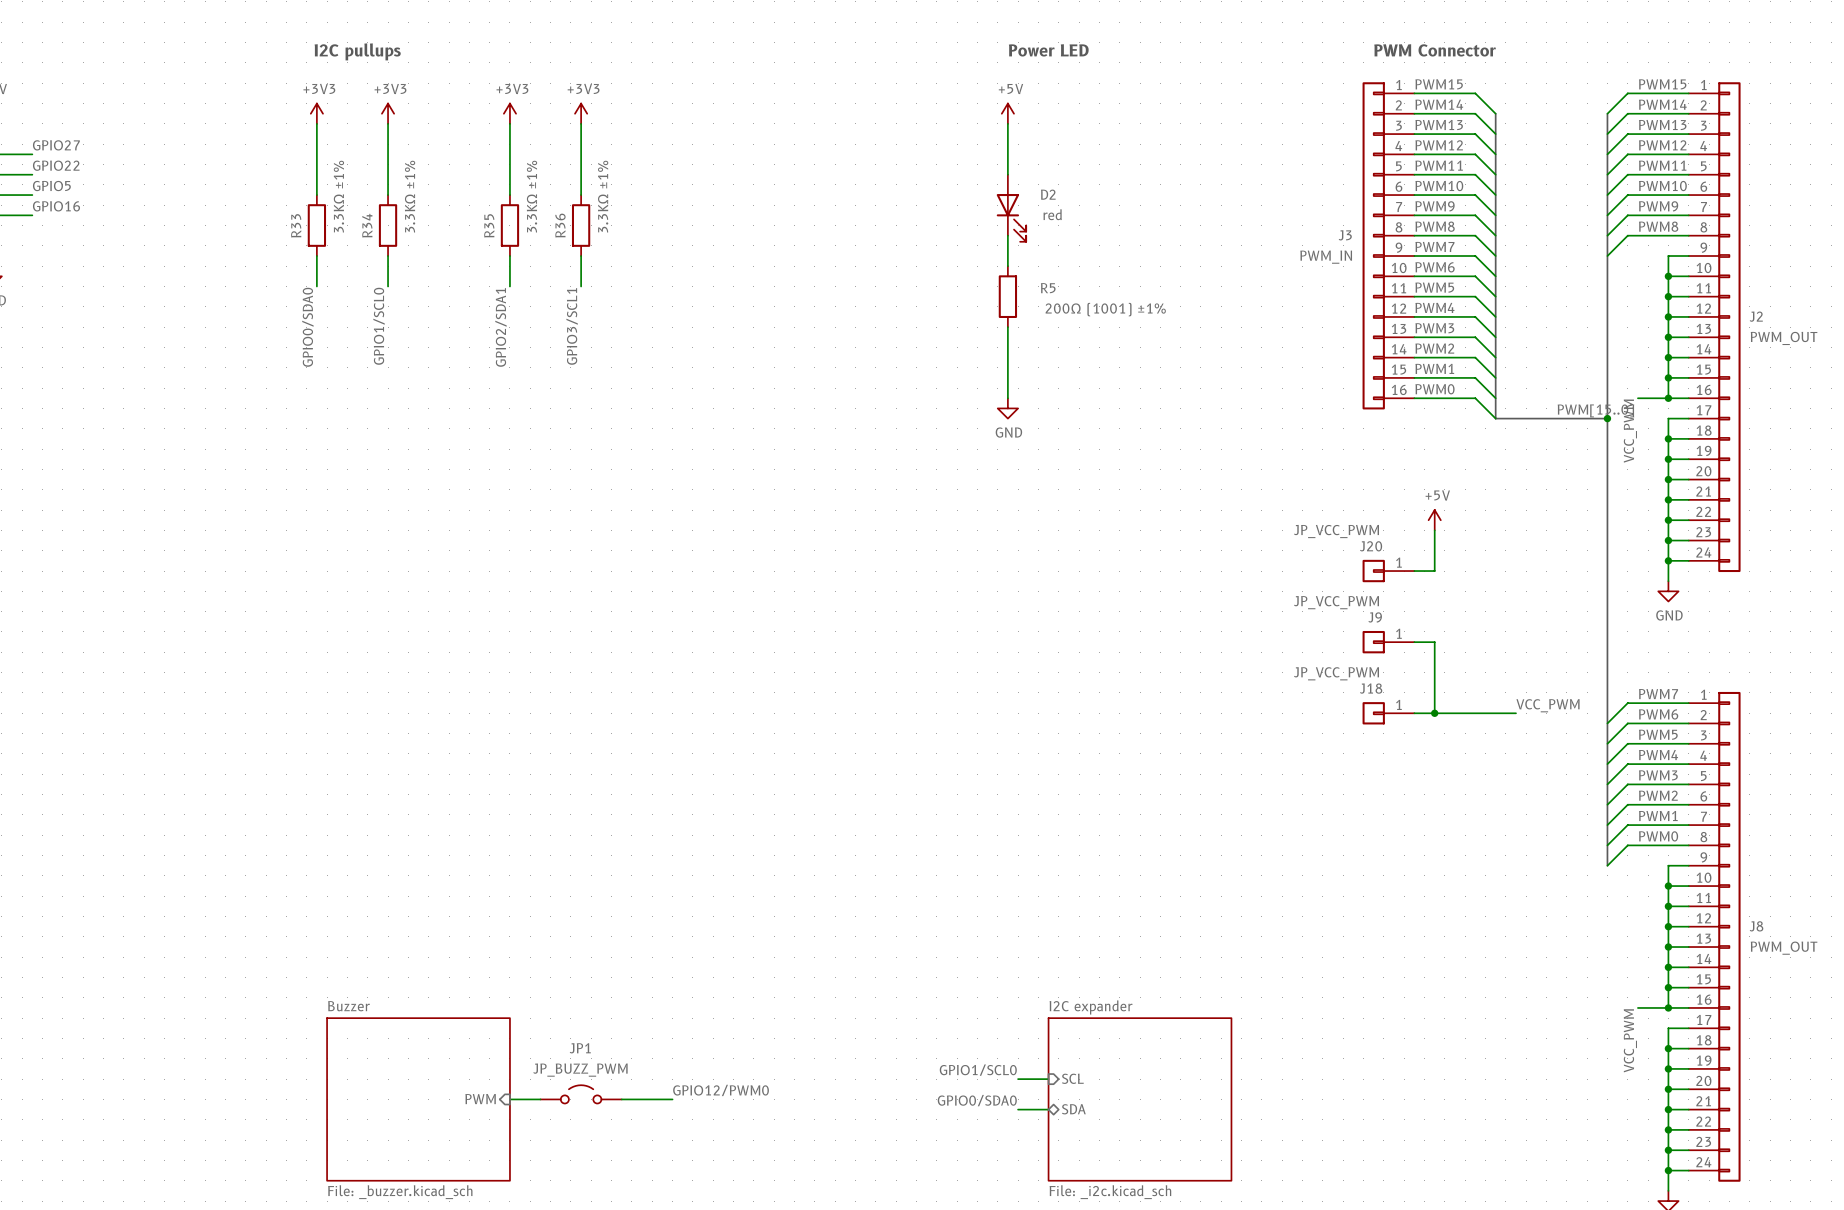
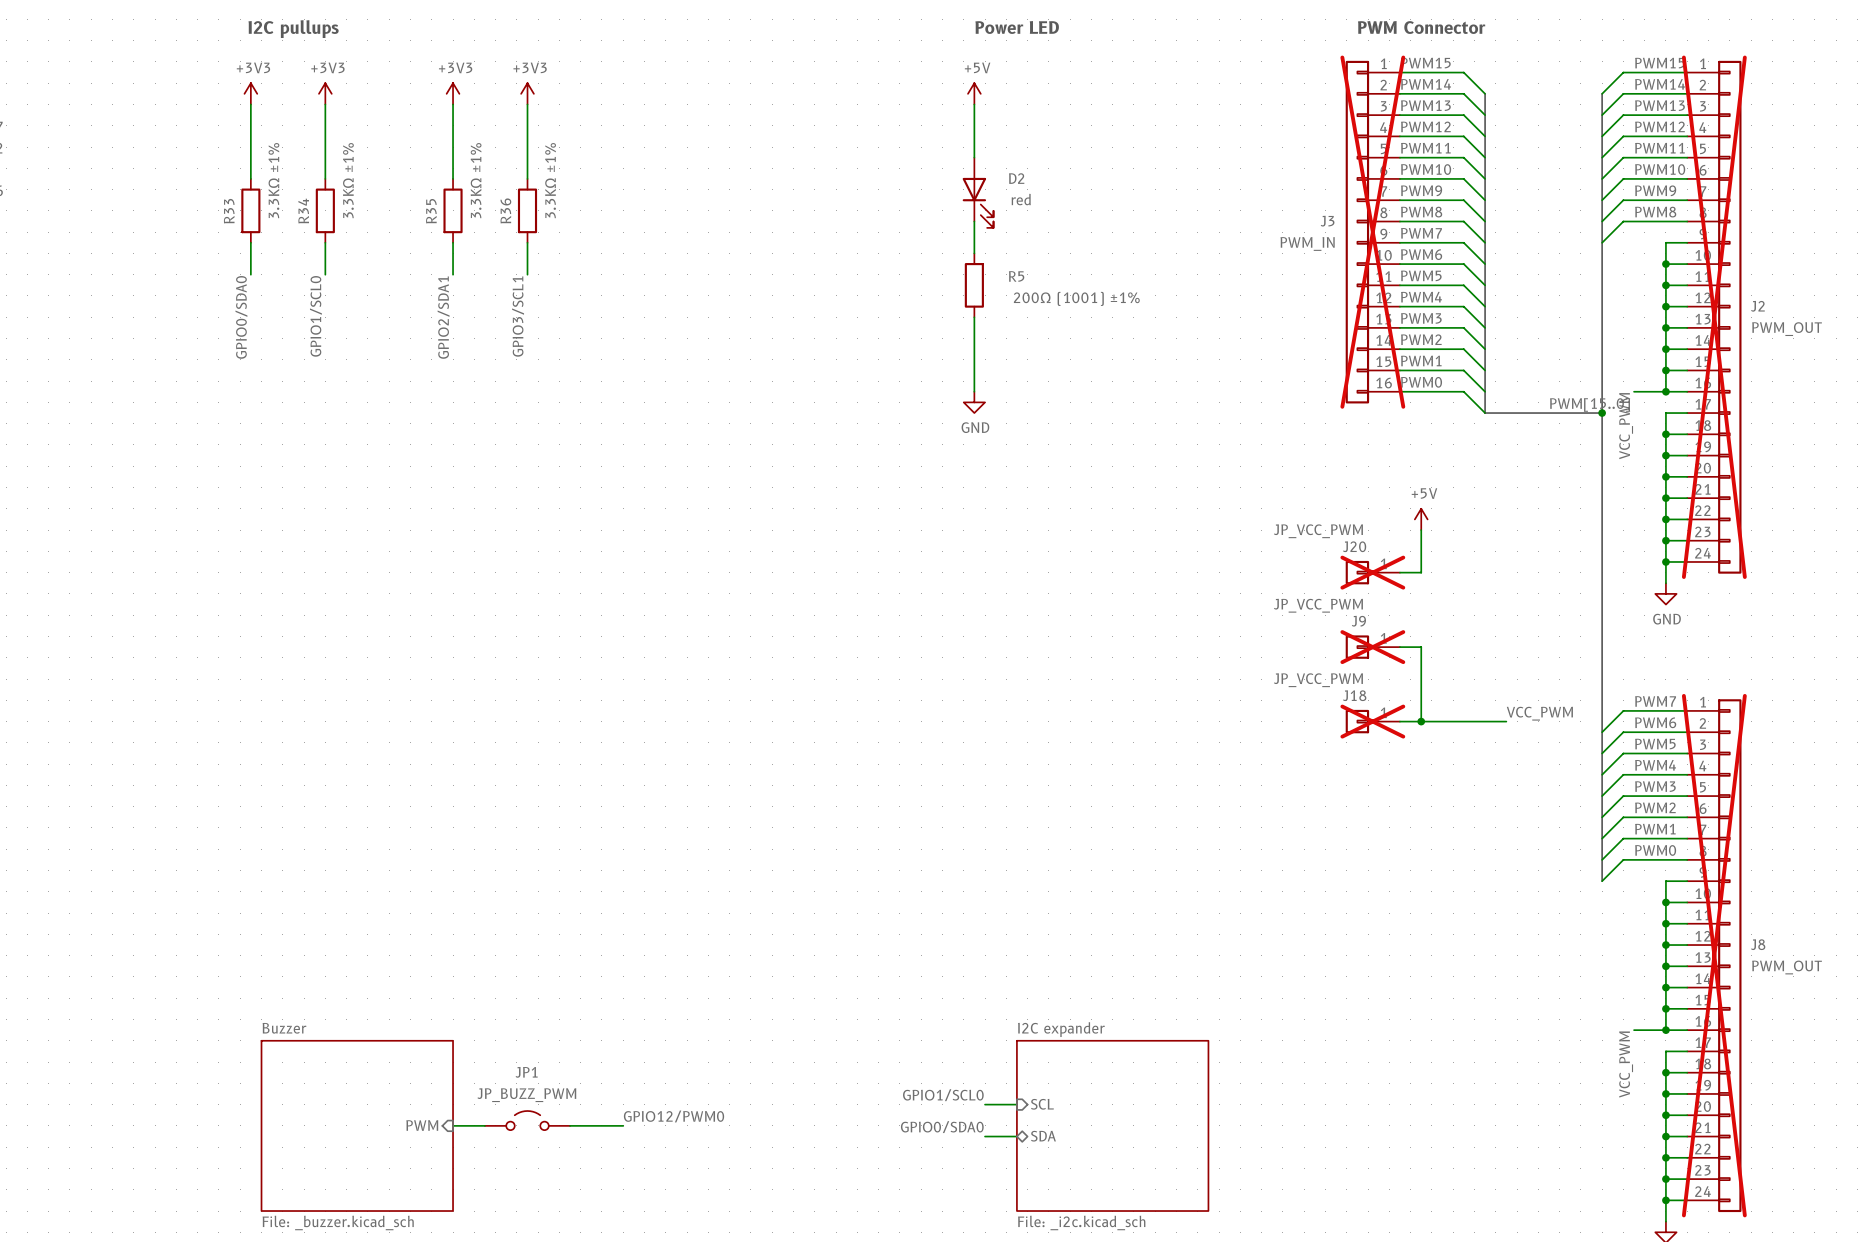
J3 do-not-place cross: none -> (1372, 232)
J2 do-not-place cross: none -> (1714, 317)
J20 do-not-place cross: none -> (1372, 572)
J9 do-not-place cross: none -> (1372, 647)
J18 do-not-place cross: none -> (1372, 721)
J8 do-not-place cross: none -> (1714, 955)

